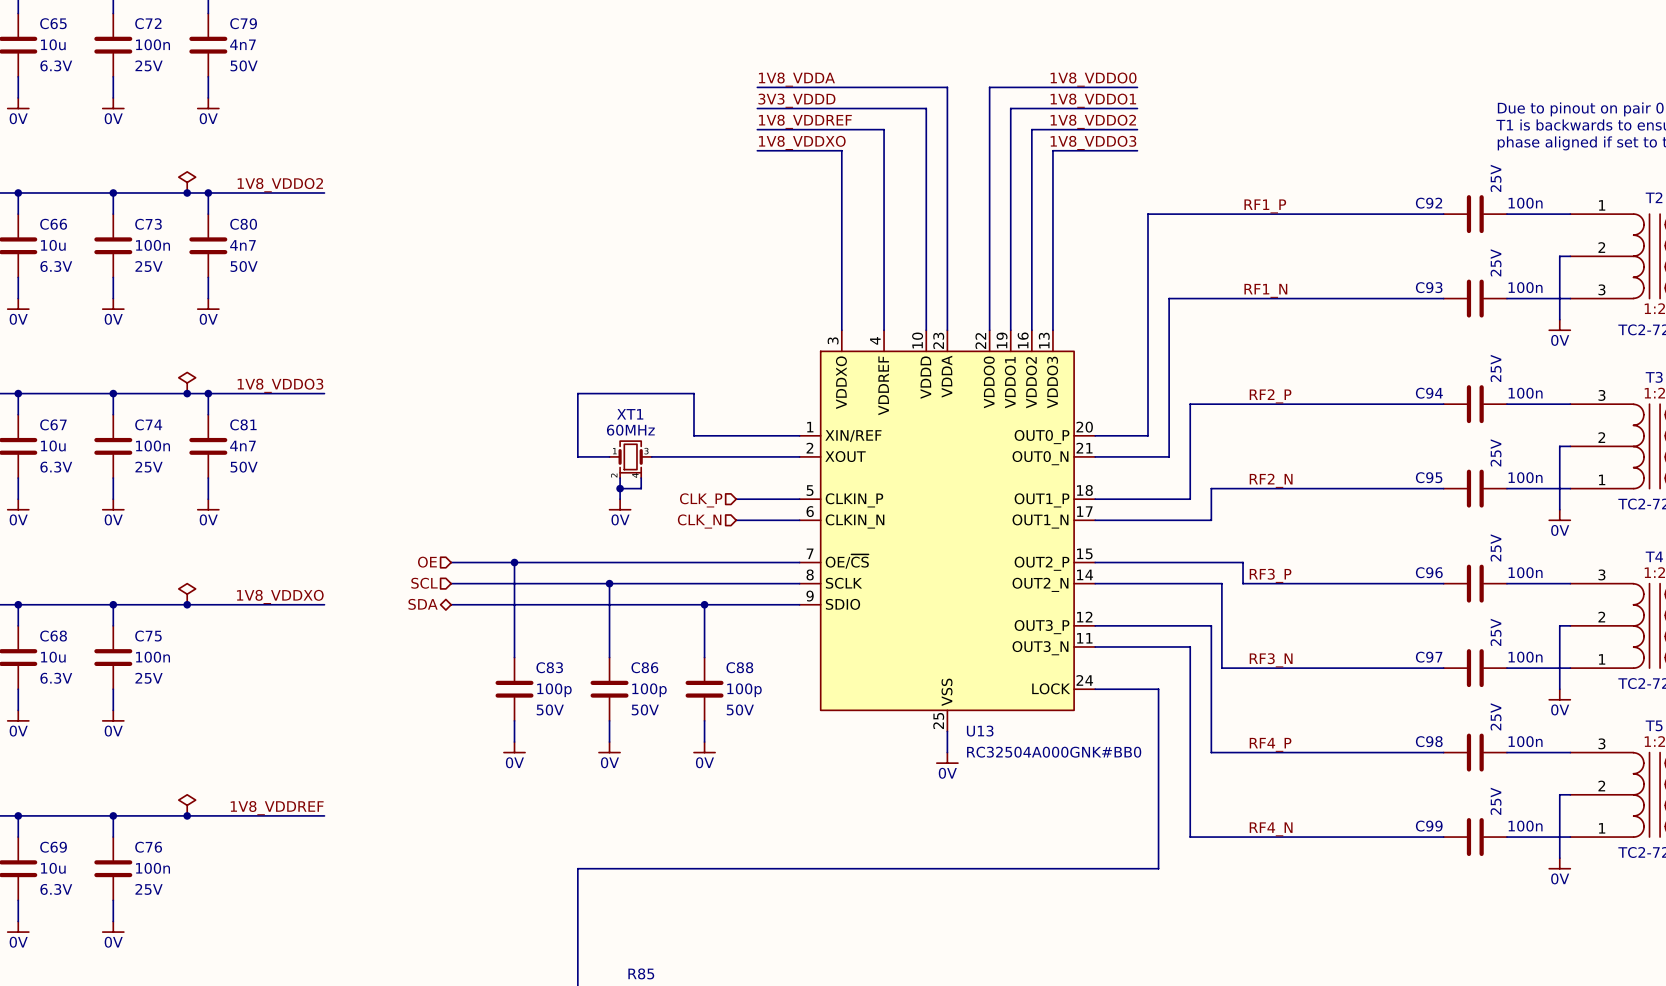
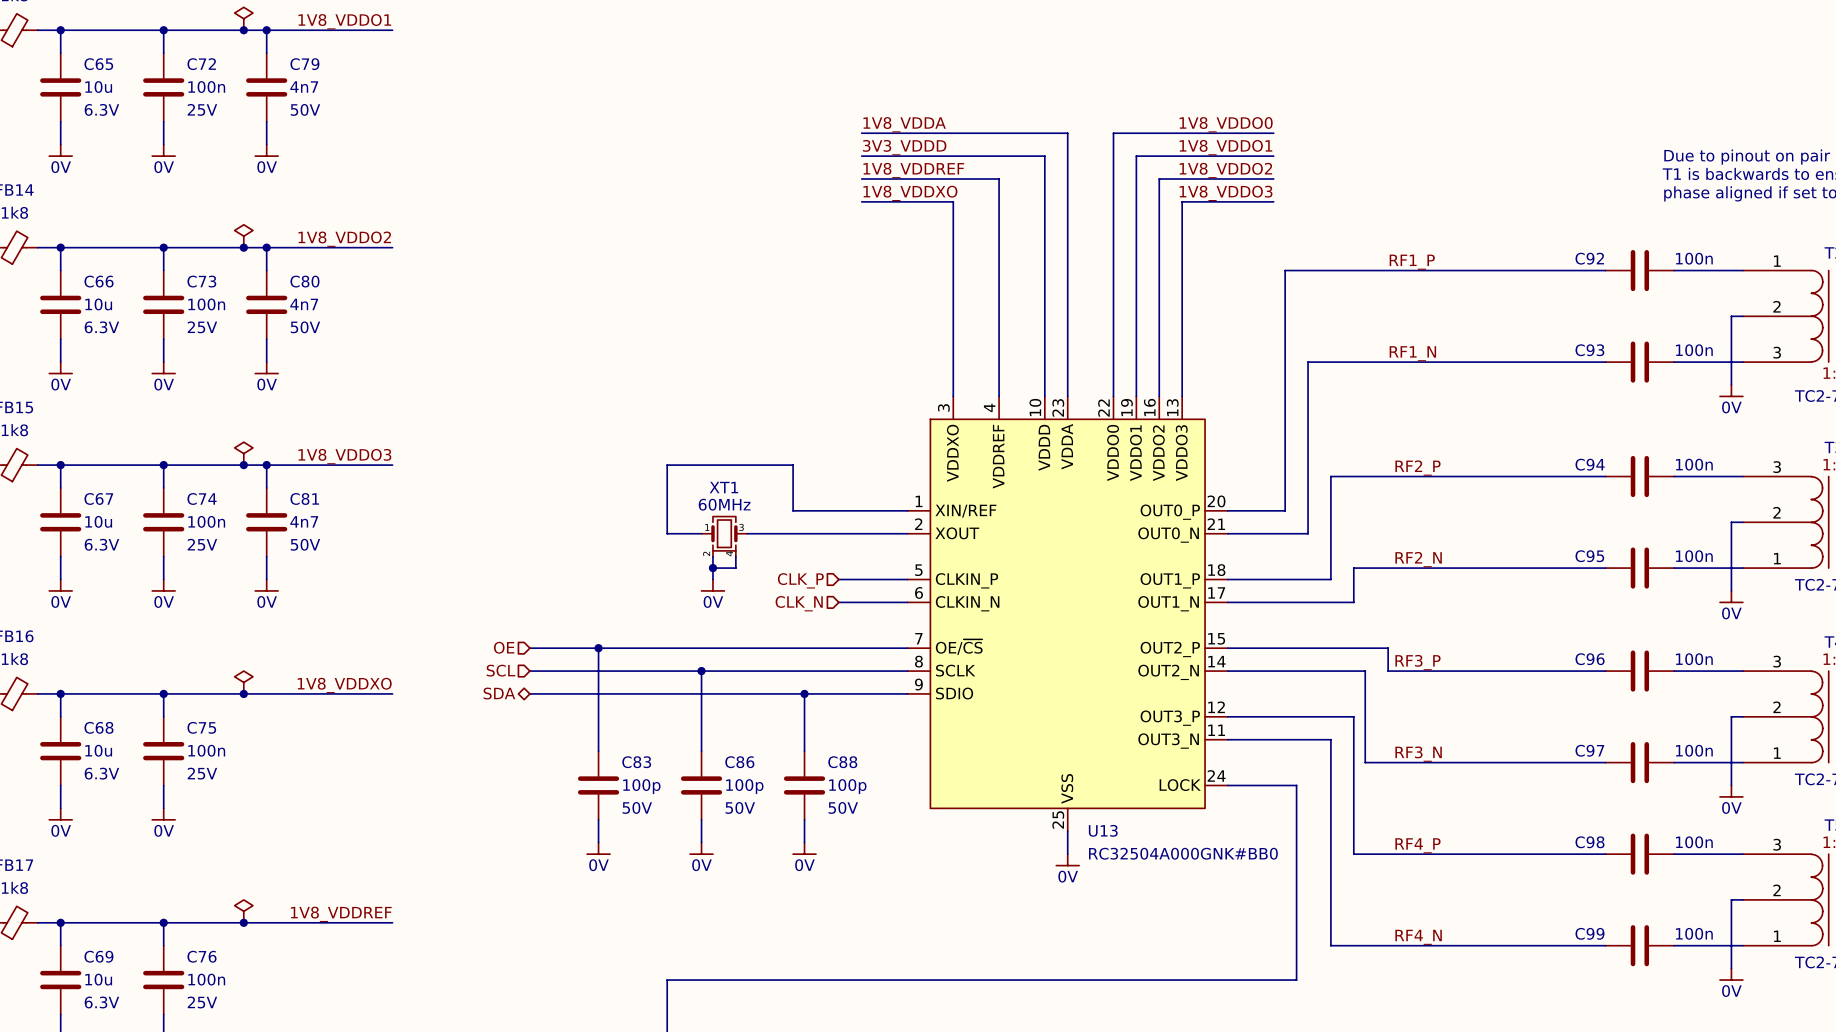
C92 text: 25V (1496, 178) -> none
C93 text: 25V (1496, 262) -> none
C94 text: 25V (1496, 368) -> none
C95 text: 25V (1496, 452) -> none
C96 text: 25V (1496, 547) -> none
C97 text: 25V (1496, 632) -> none
C98 text: 25V (1496, 716) -> none
C99 text: 25V (1496, 801) -> none

